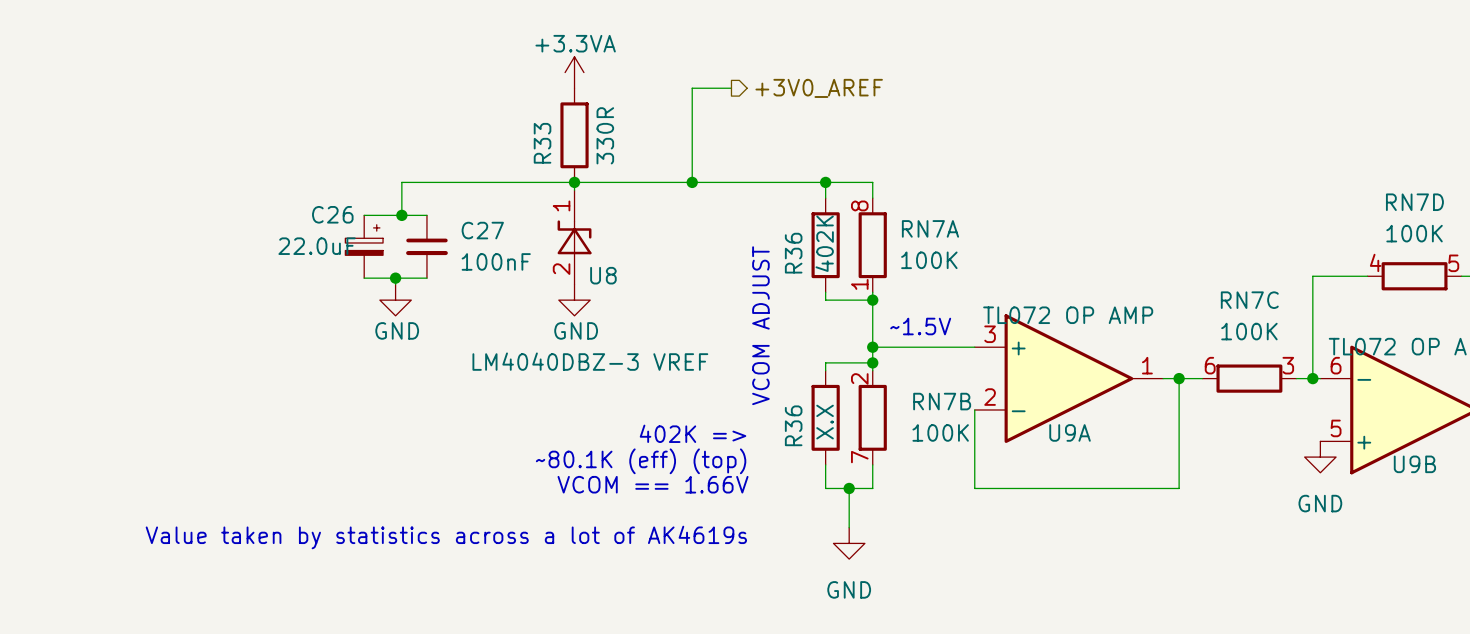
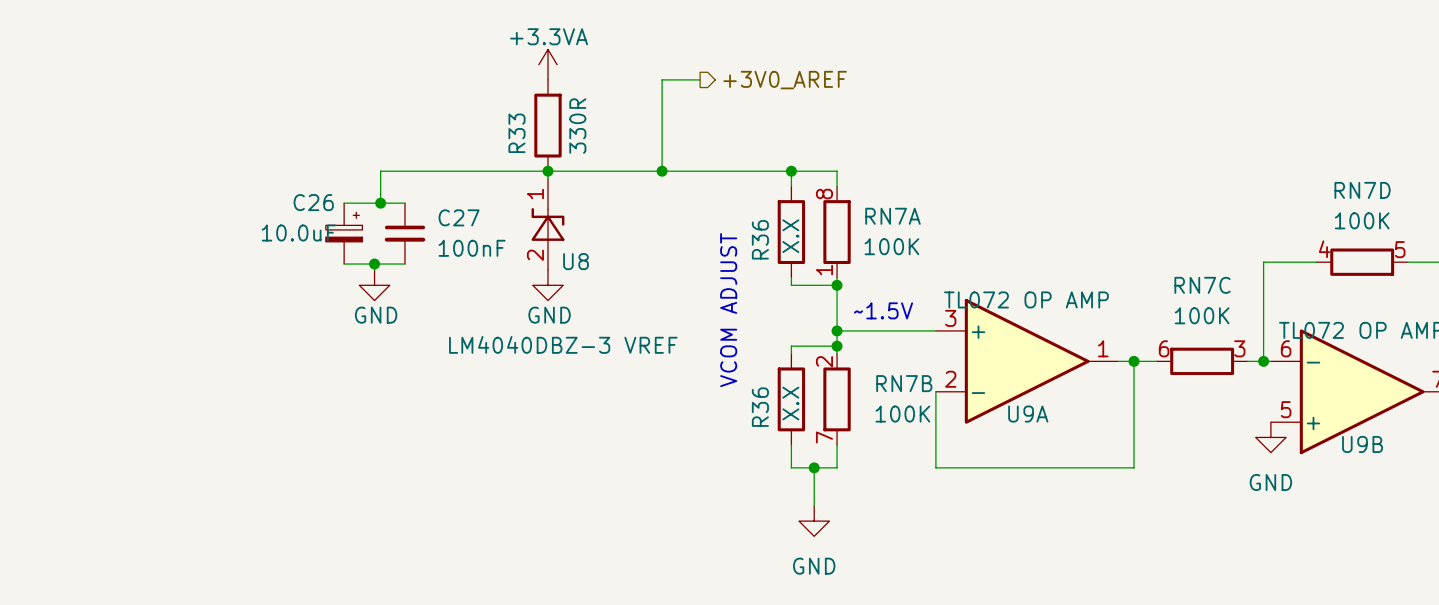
R36 value: 402K (824, 243) -> X.X (790, 236)
C26 value: 22.0uF (317, 246) -> 10.0uF (298, 233)
text: 402K => (693, 433) -> none
text: ~80.1K (eff) (top) (641, 461) -> none
text: VCOM == 1.66V (653, 484) -> none
text: Value taken by statistics across a lot of AK4619s (446, 537) -> none

